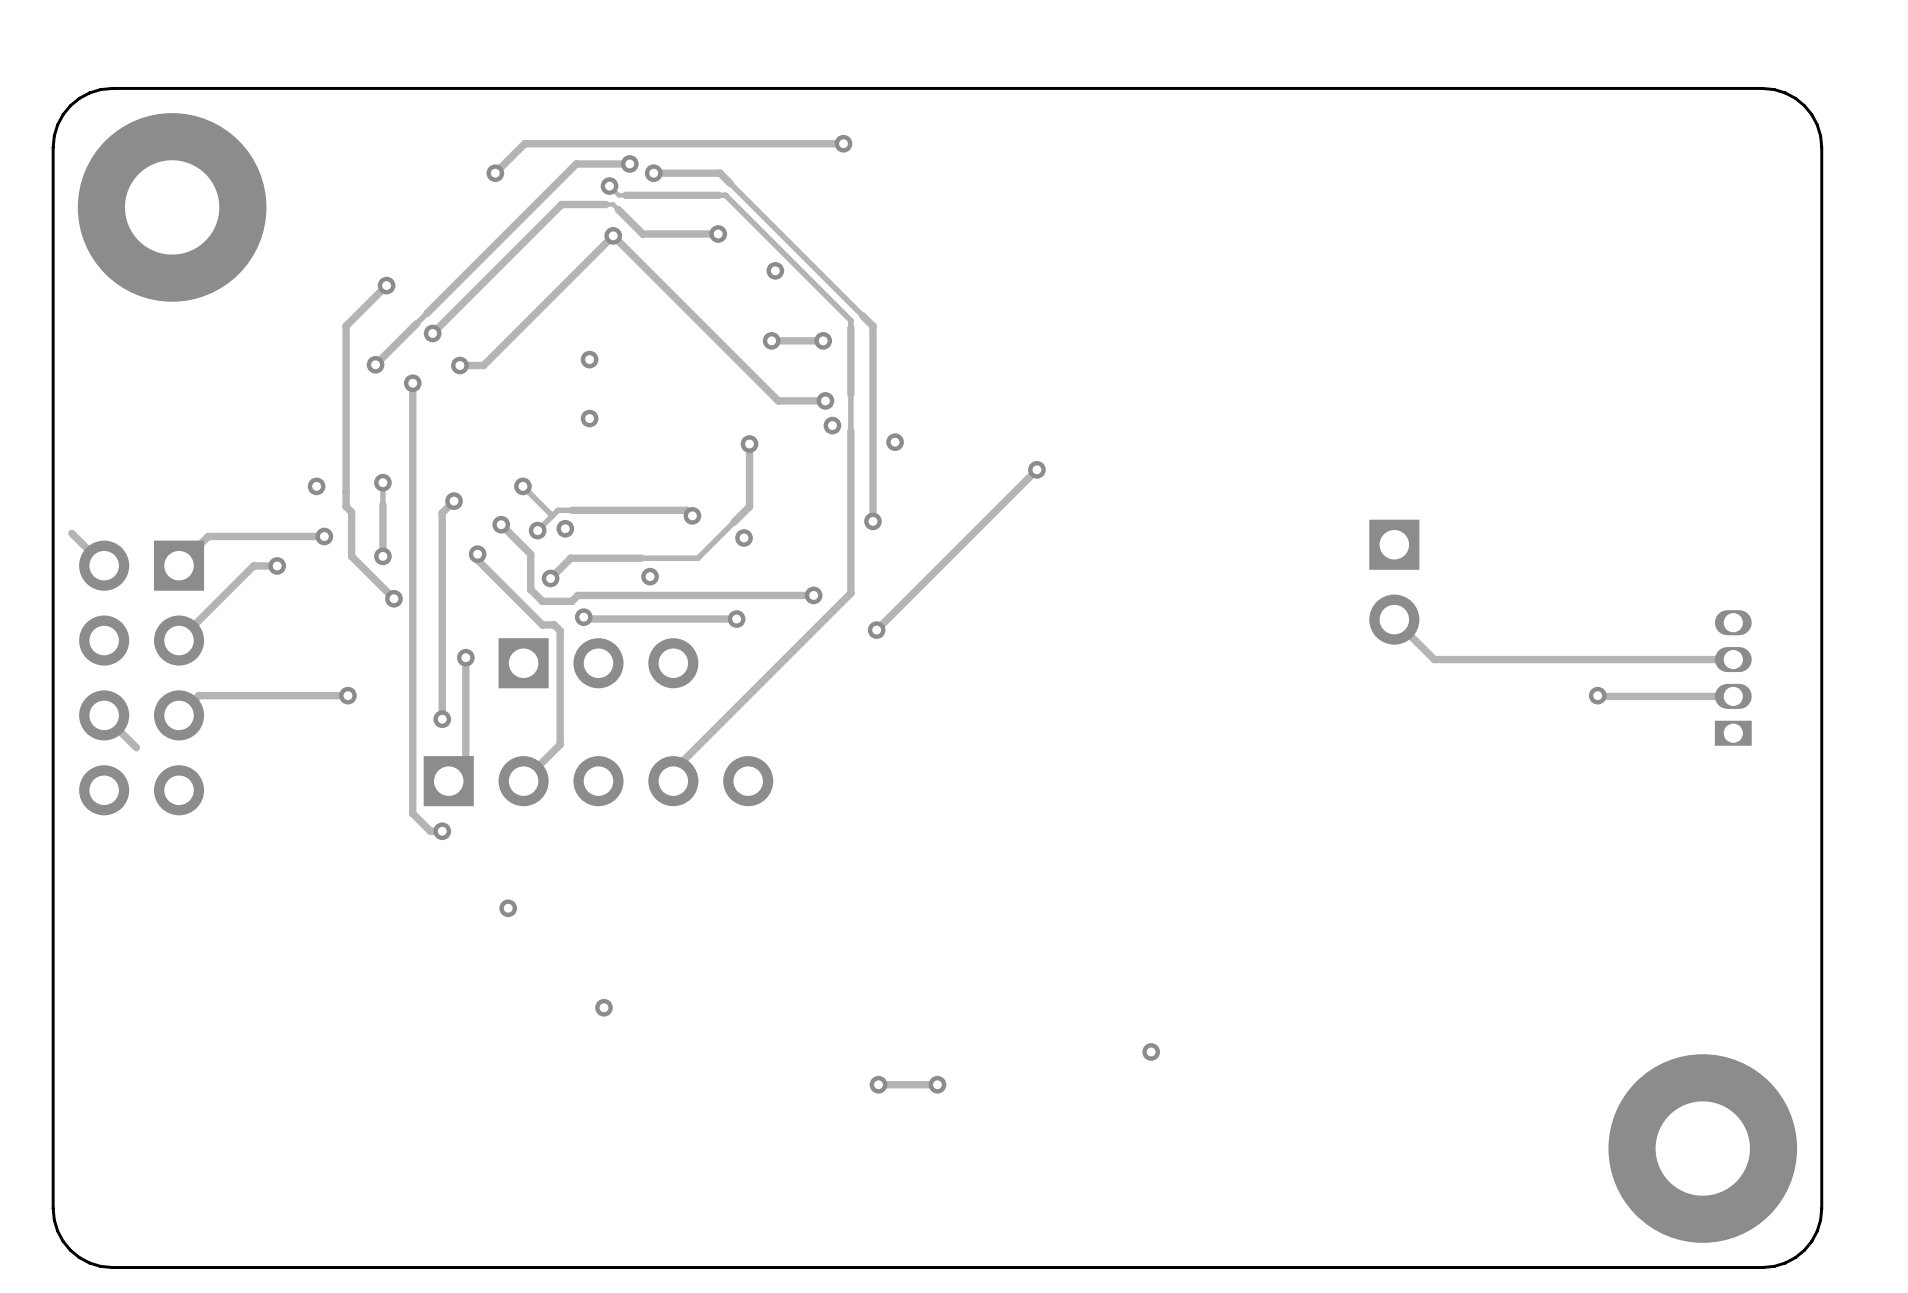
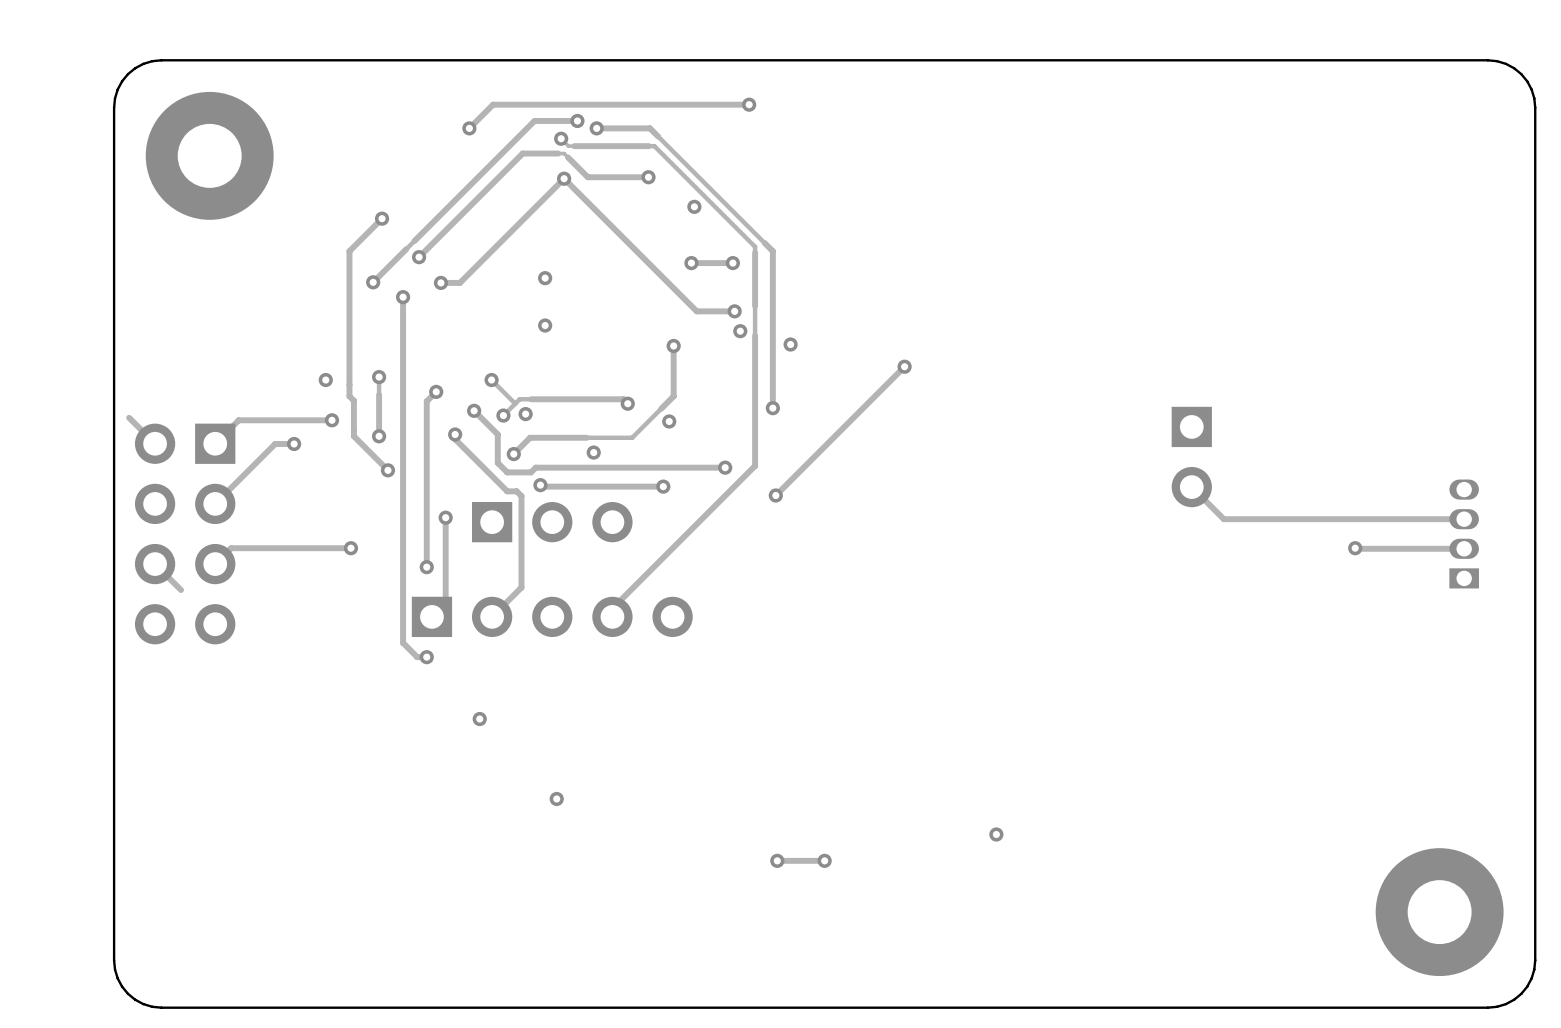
part footprint: [77, 113, 267, 302] -> [145, 91, 274, 220]
part footprint: [1608, 1054, 1798, 1243] -> [1375, 848, 1504, 977]

